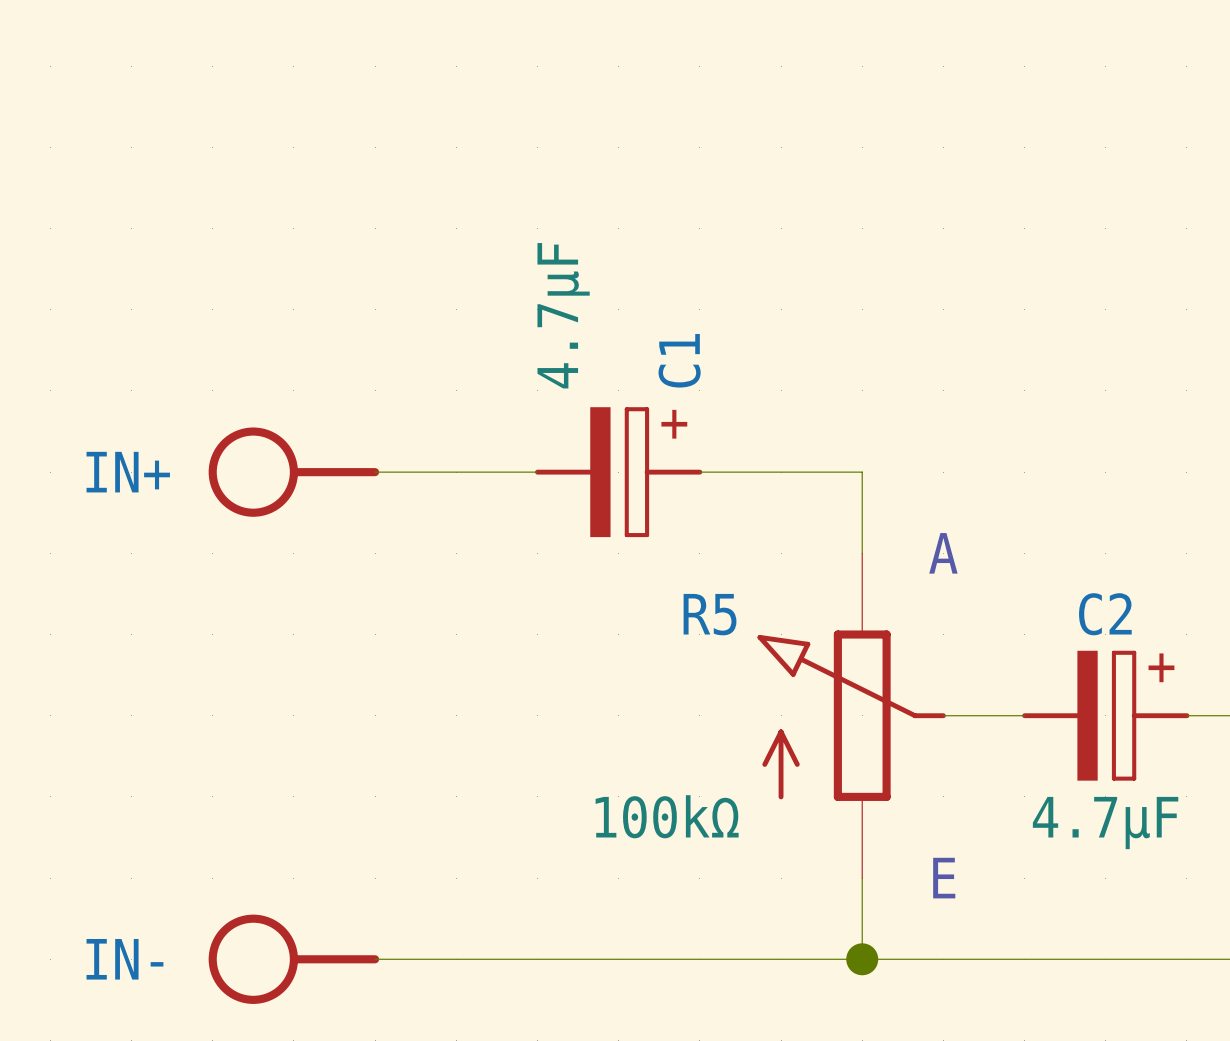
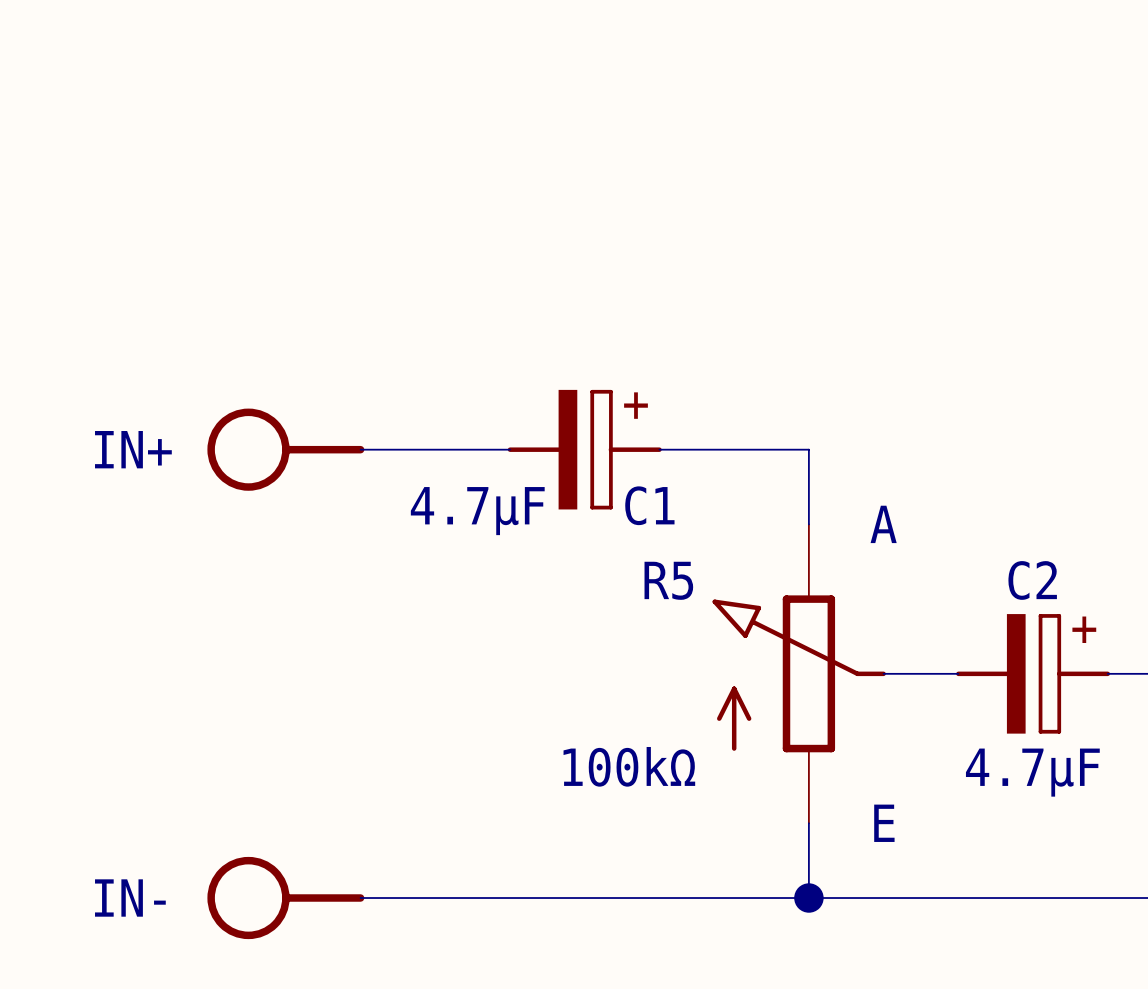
C1 value rotation: 0° (563, 315) -> 90° clockwise (477, 511)
C1 value position: 4.7μF (563, 315) -> 4.7μF (477, 511)
C1 name rotation: 0° (679, 360) -> 90° clockwise (649, 505)
C1 name position: C1 (679, 360) -> C1 (649, 505)

